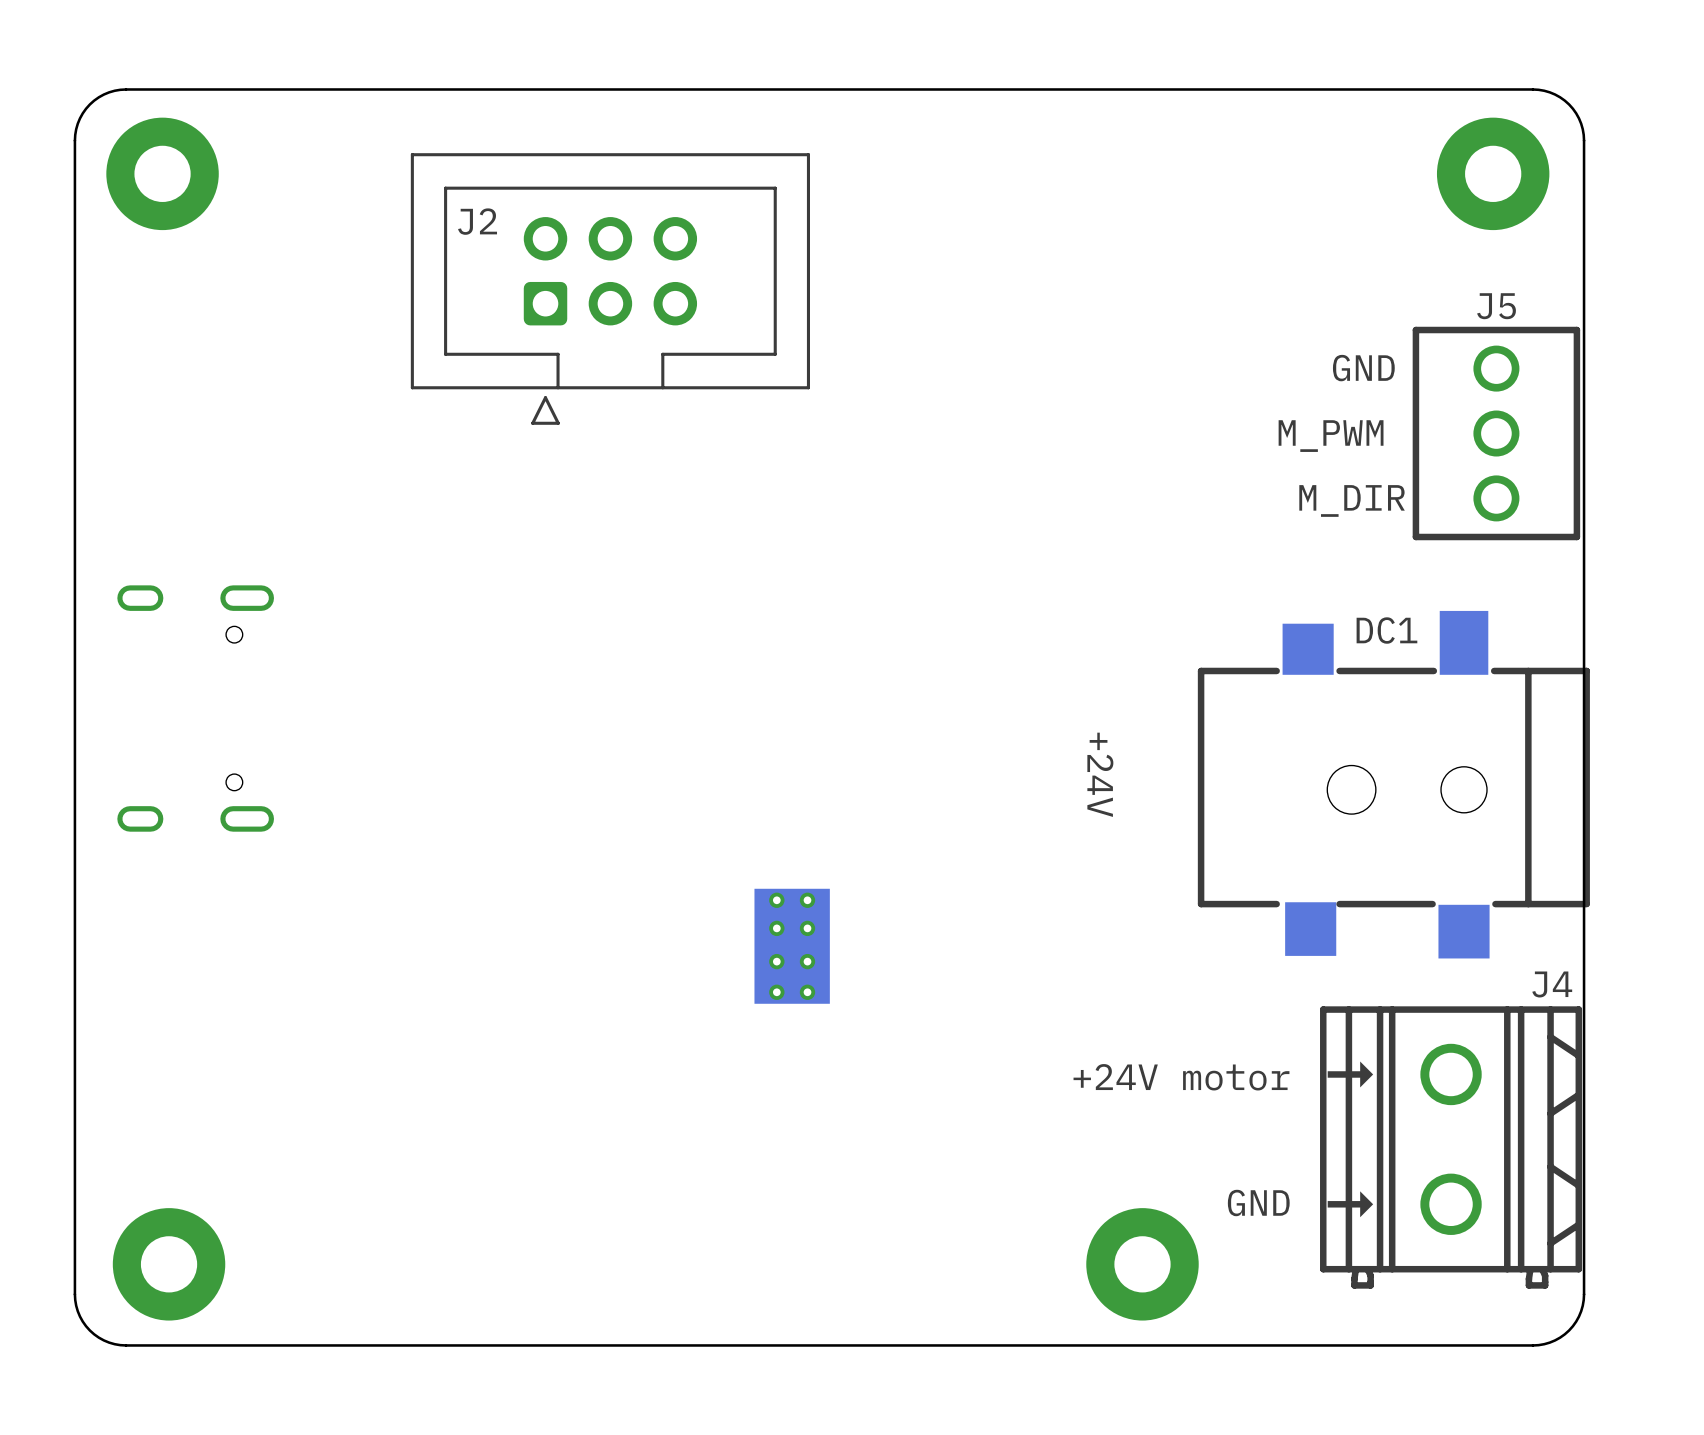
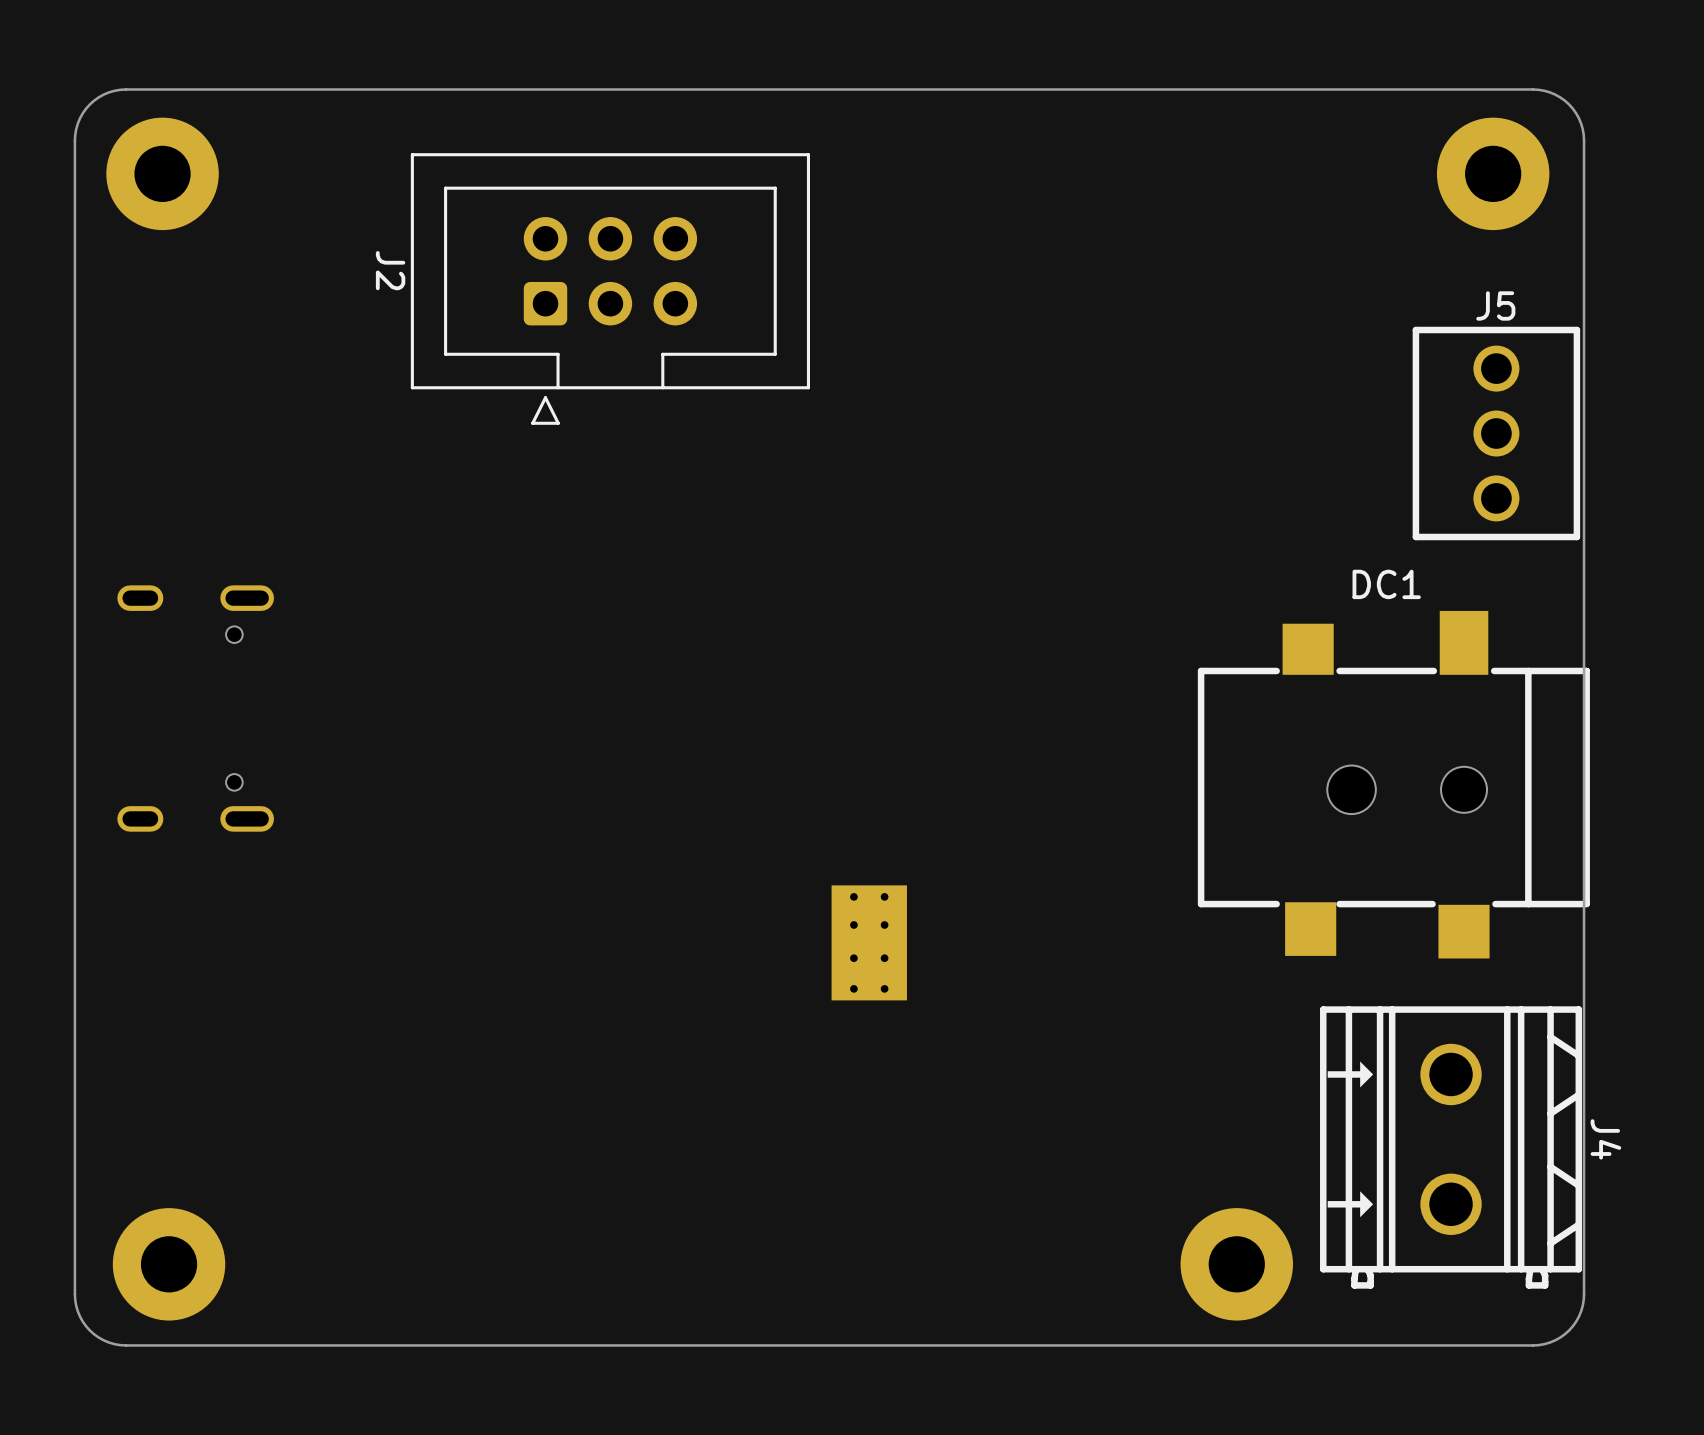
J2 name rotation: 0° (477, 221) -> 90° clockwise (390, 270)
J2 name position: J2 (477, 221) -> J2 (390, 270)
text: GND (1363, 368) -> none
text: M_PWM (1331, 436) -> none
text: M_DIR (1352, 500) -> none
DC1 name position: DC1 (1386, 630) -> DC1 (1386, 584)
text: +24V (1100, 774) -> none
part position: (792, 946) -> (869, 942)
J4 name rotation: 0° (1552, 984) -> 90° clockwise (1605, 1139)
J4 name position: J4 (1552, 984) -> J4 (1605, 1139)
text: +24V motor (1181, 1077) -> none
text: GND (1258, 1202) -> none
part position: (1142, 1264) -> (1236, 1264)

